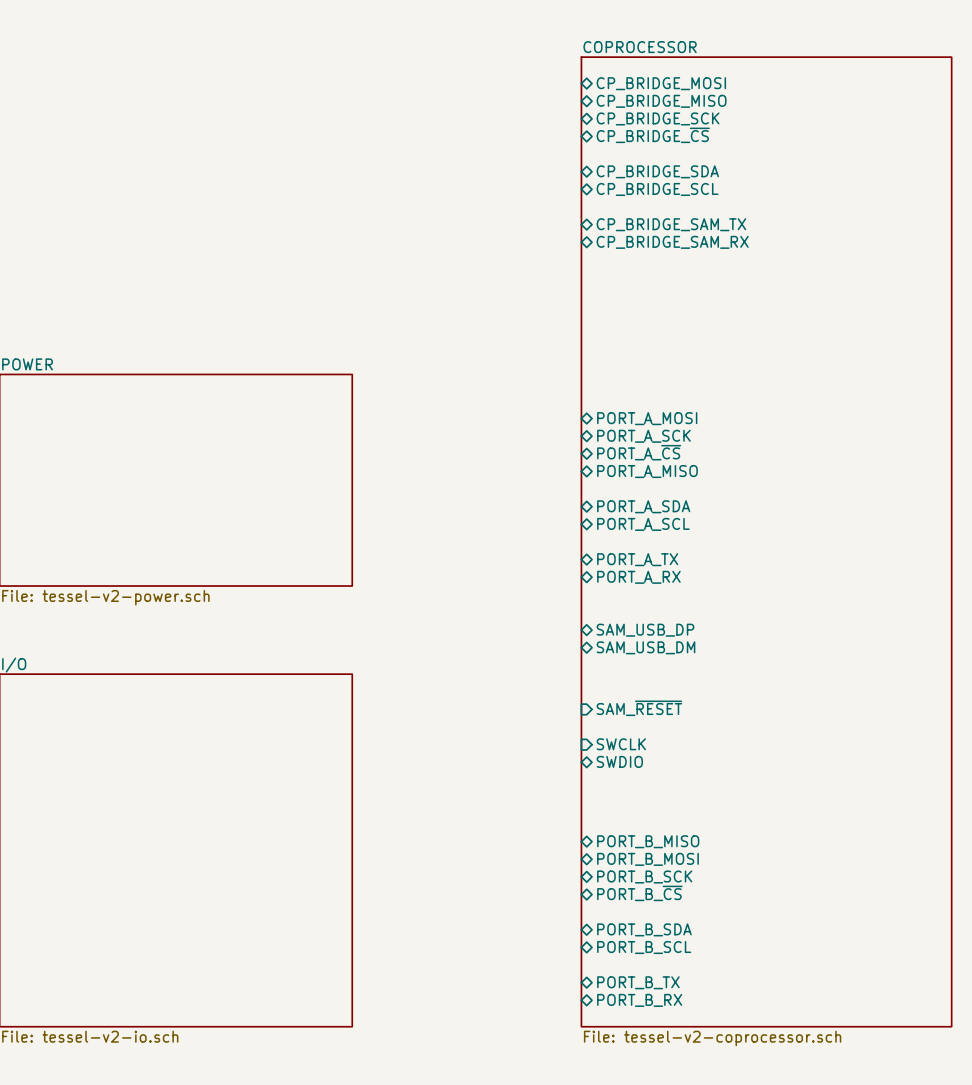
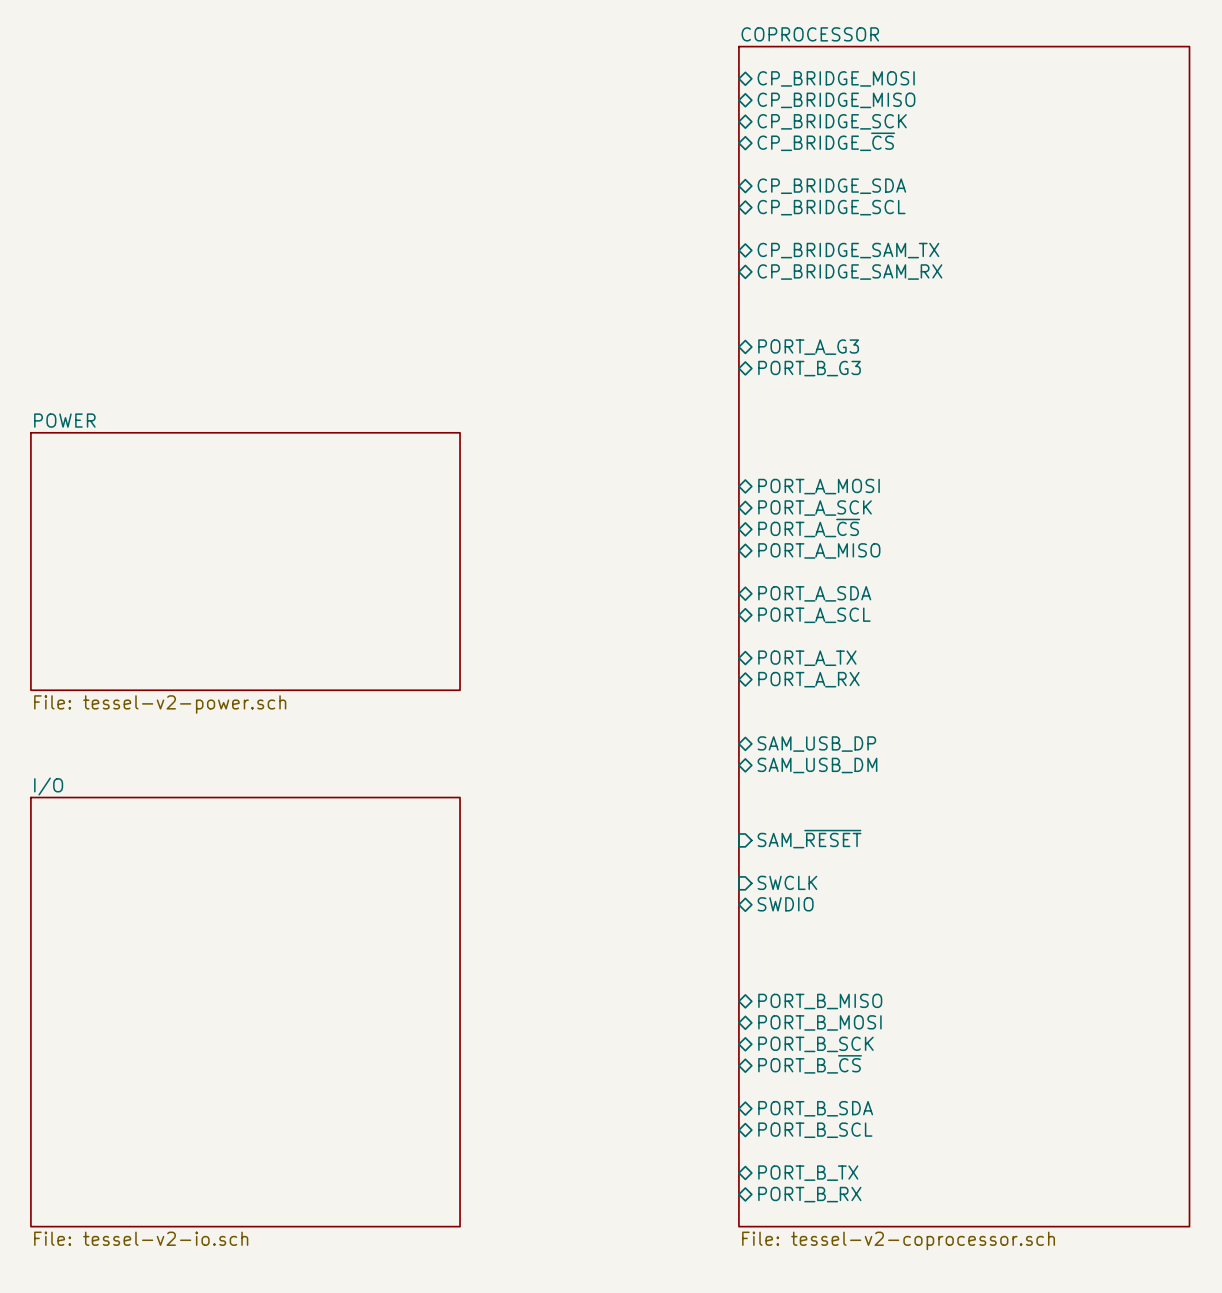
sheet pin: none -> PORT_A_G3 (808, 347)
sheet pin: none -> PORT_B_G3 (809, 368)

